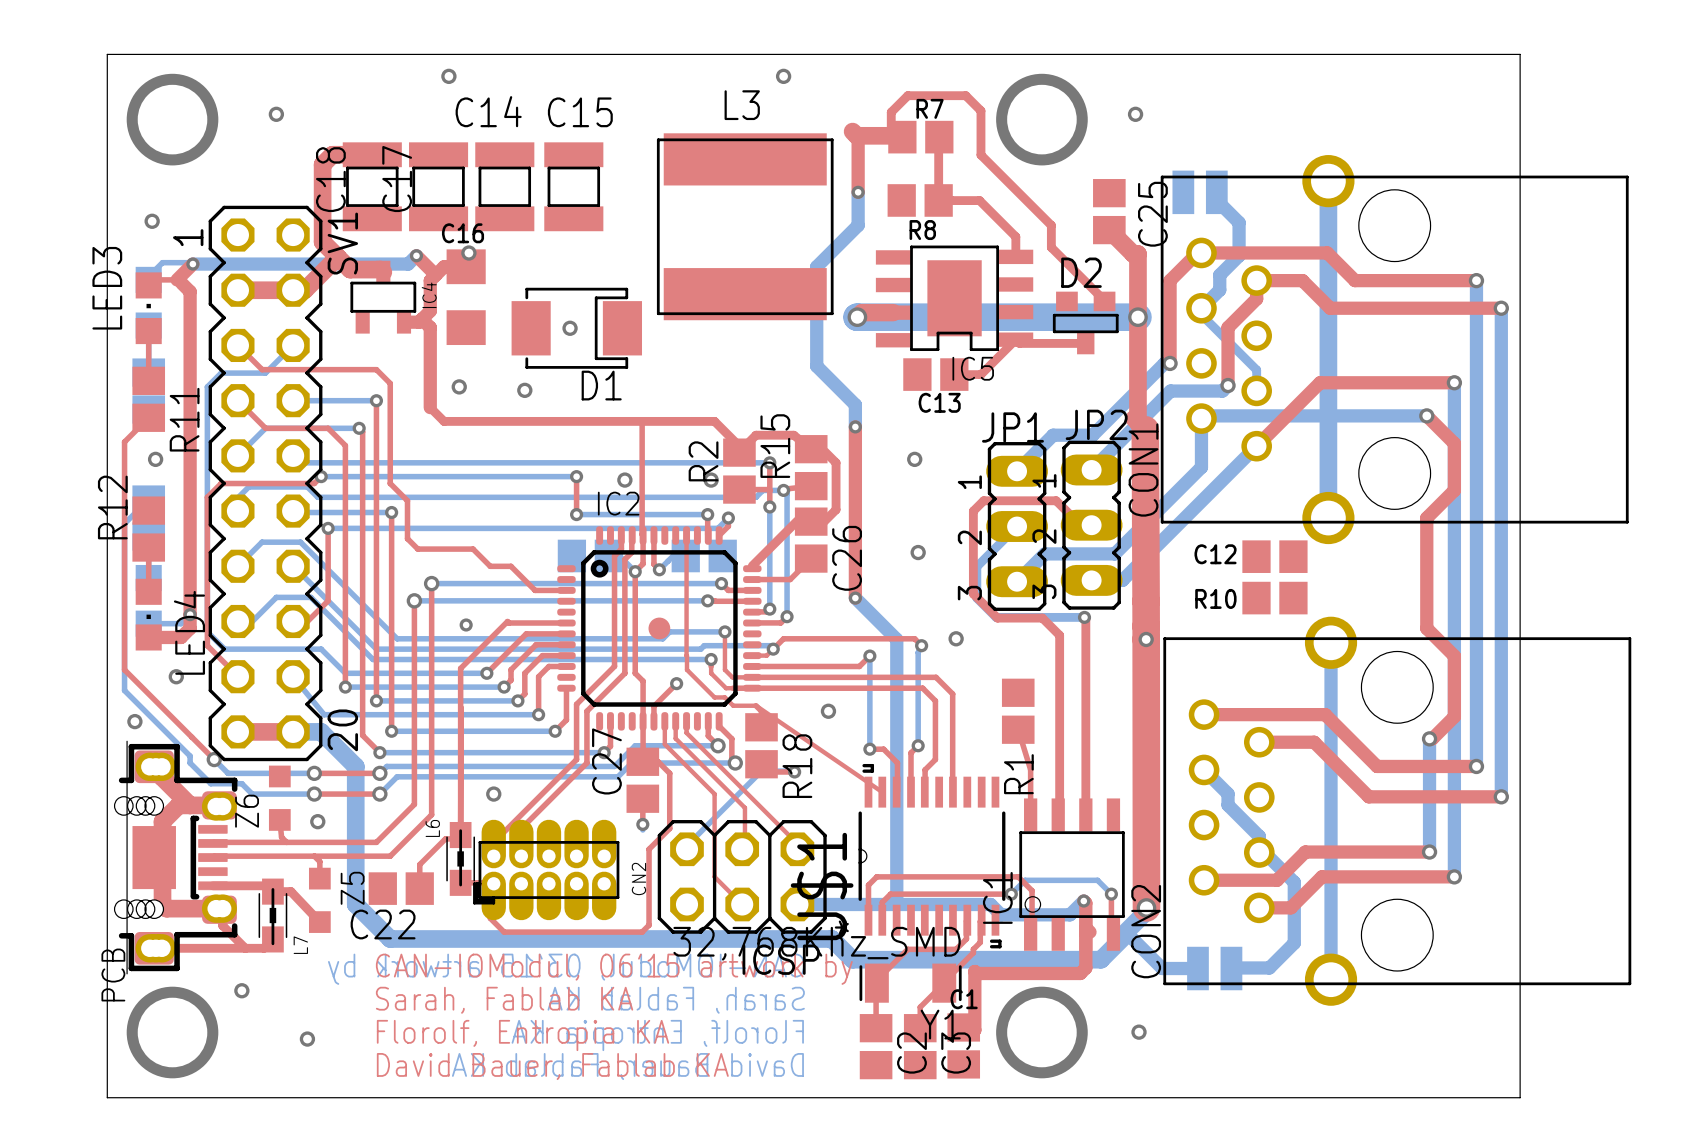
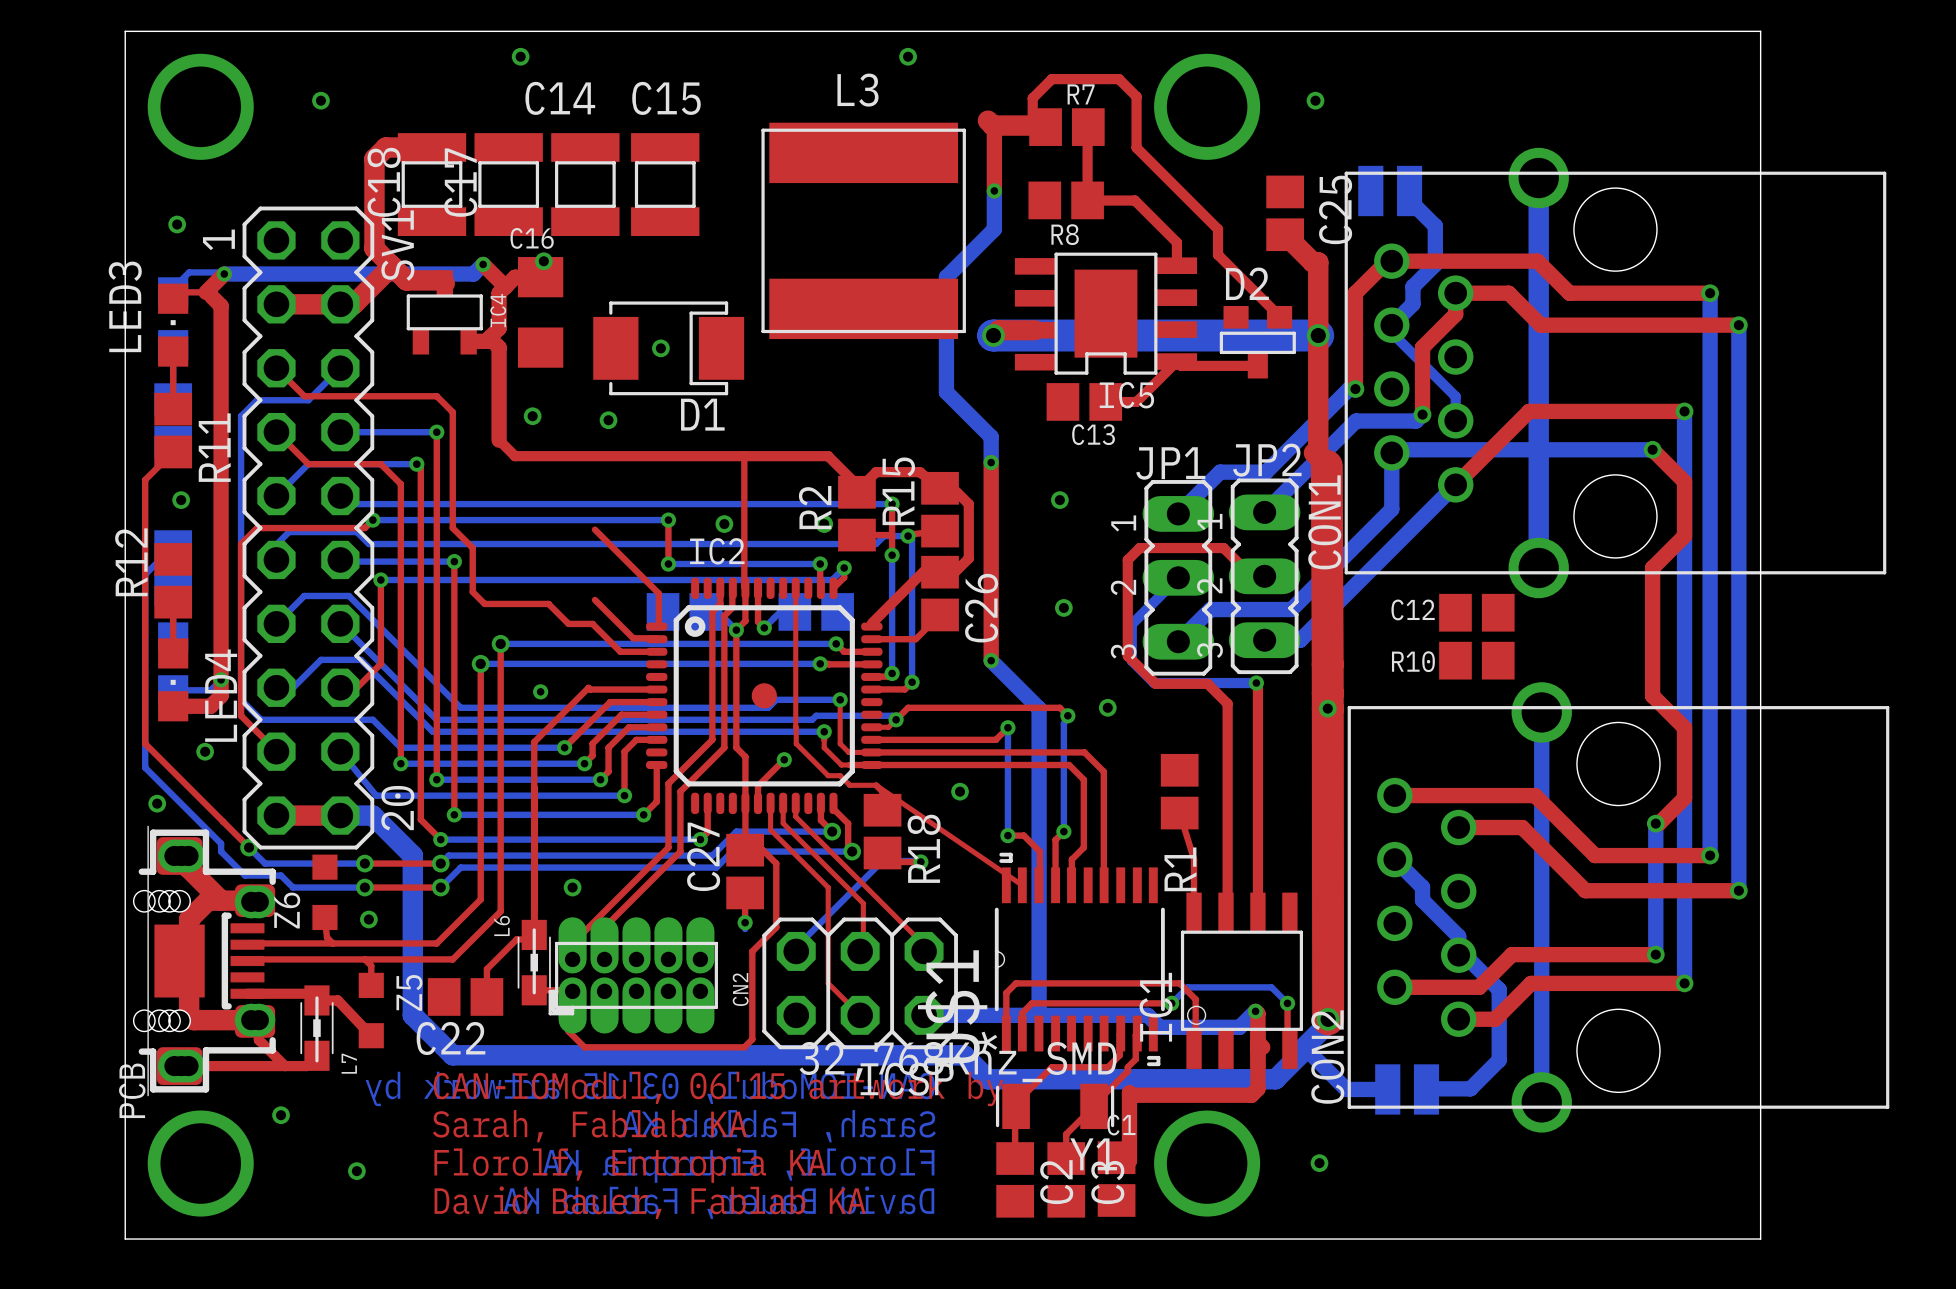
top track: none -> (594, 529) (658, 593) (658, 624) (656, 626)
top track: none -> (594, 599) (633, 638) (656, 639)

